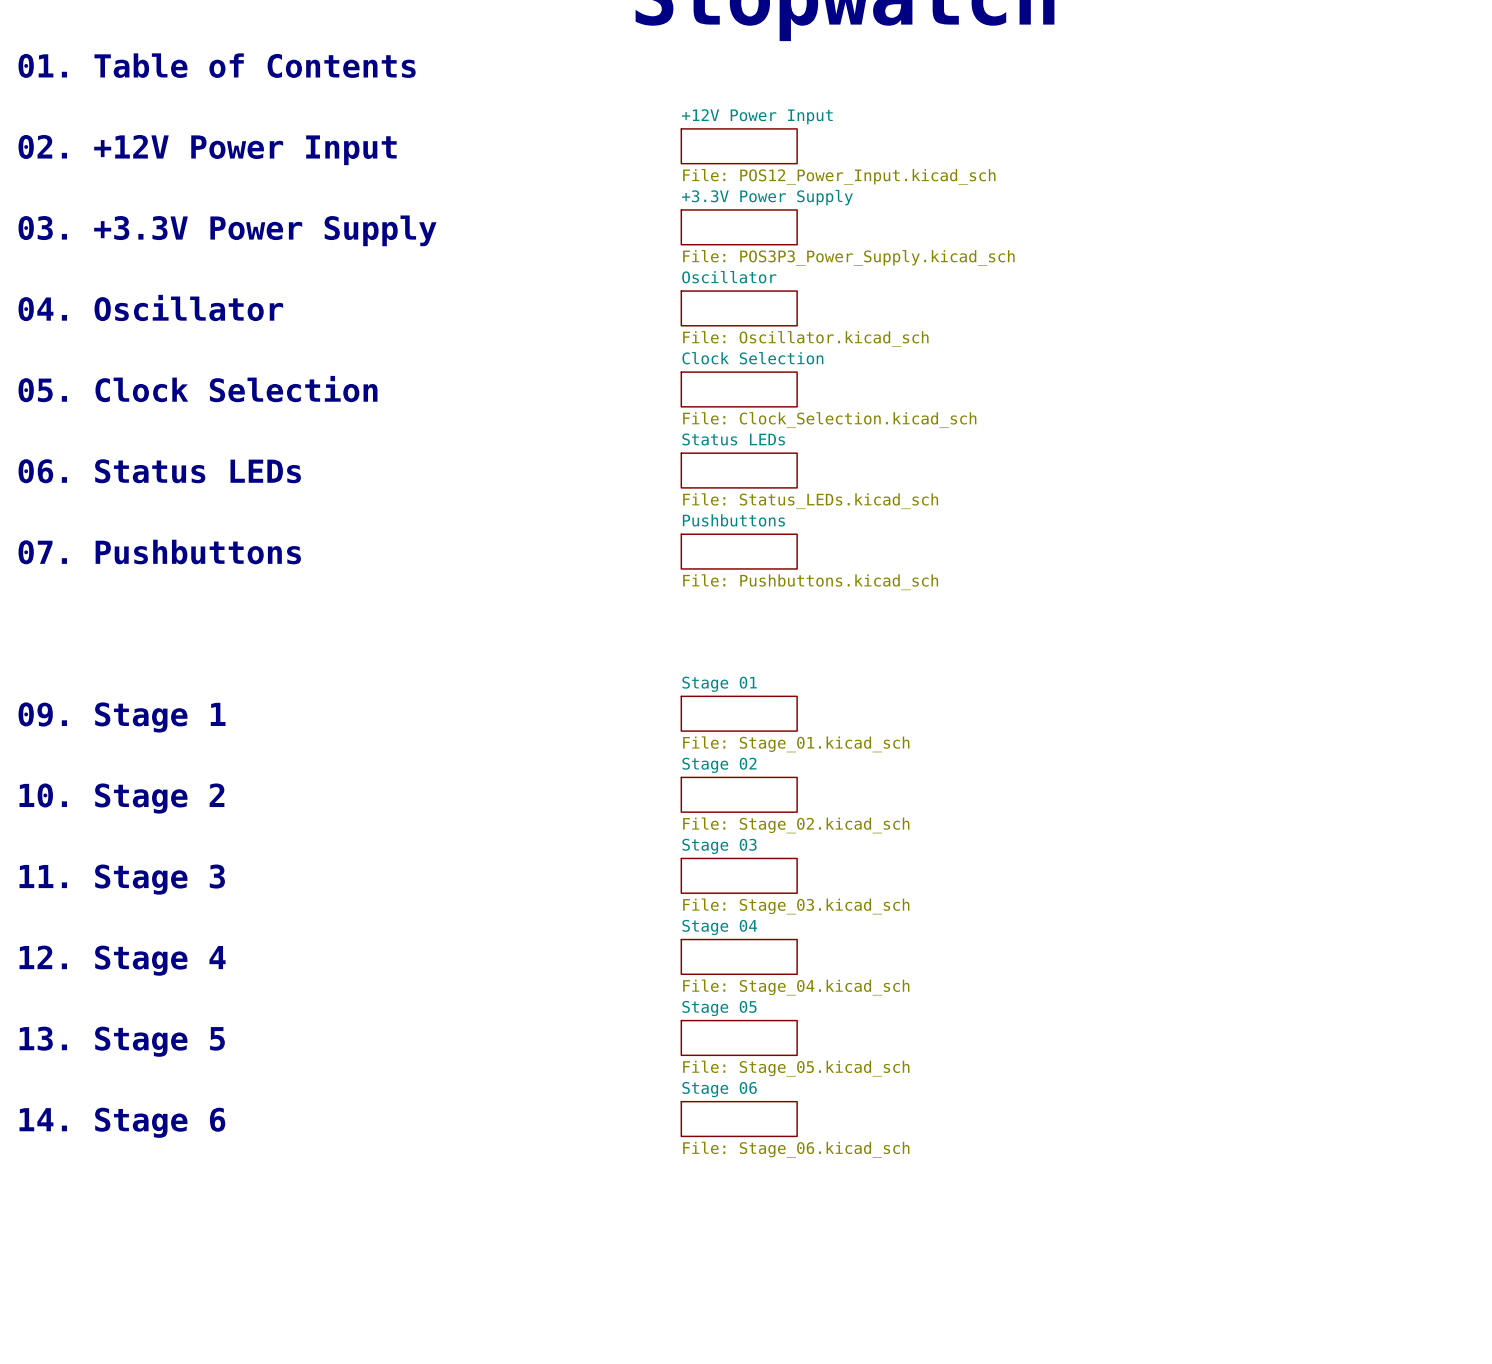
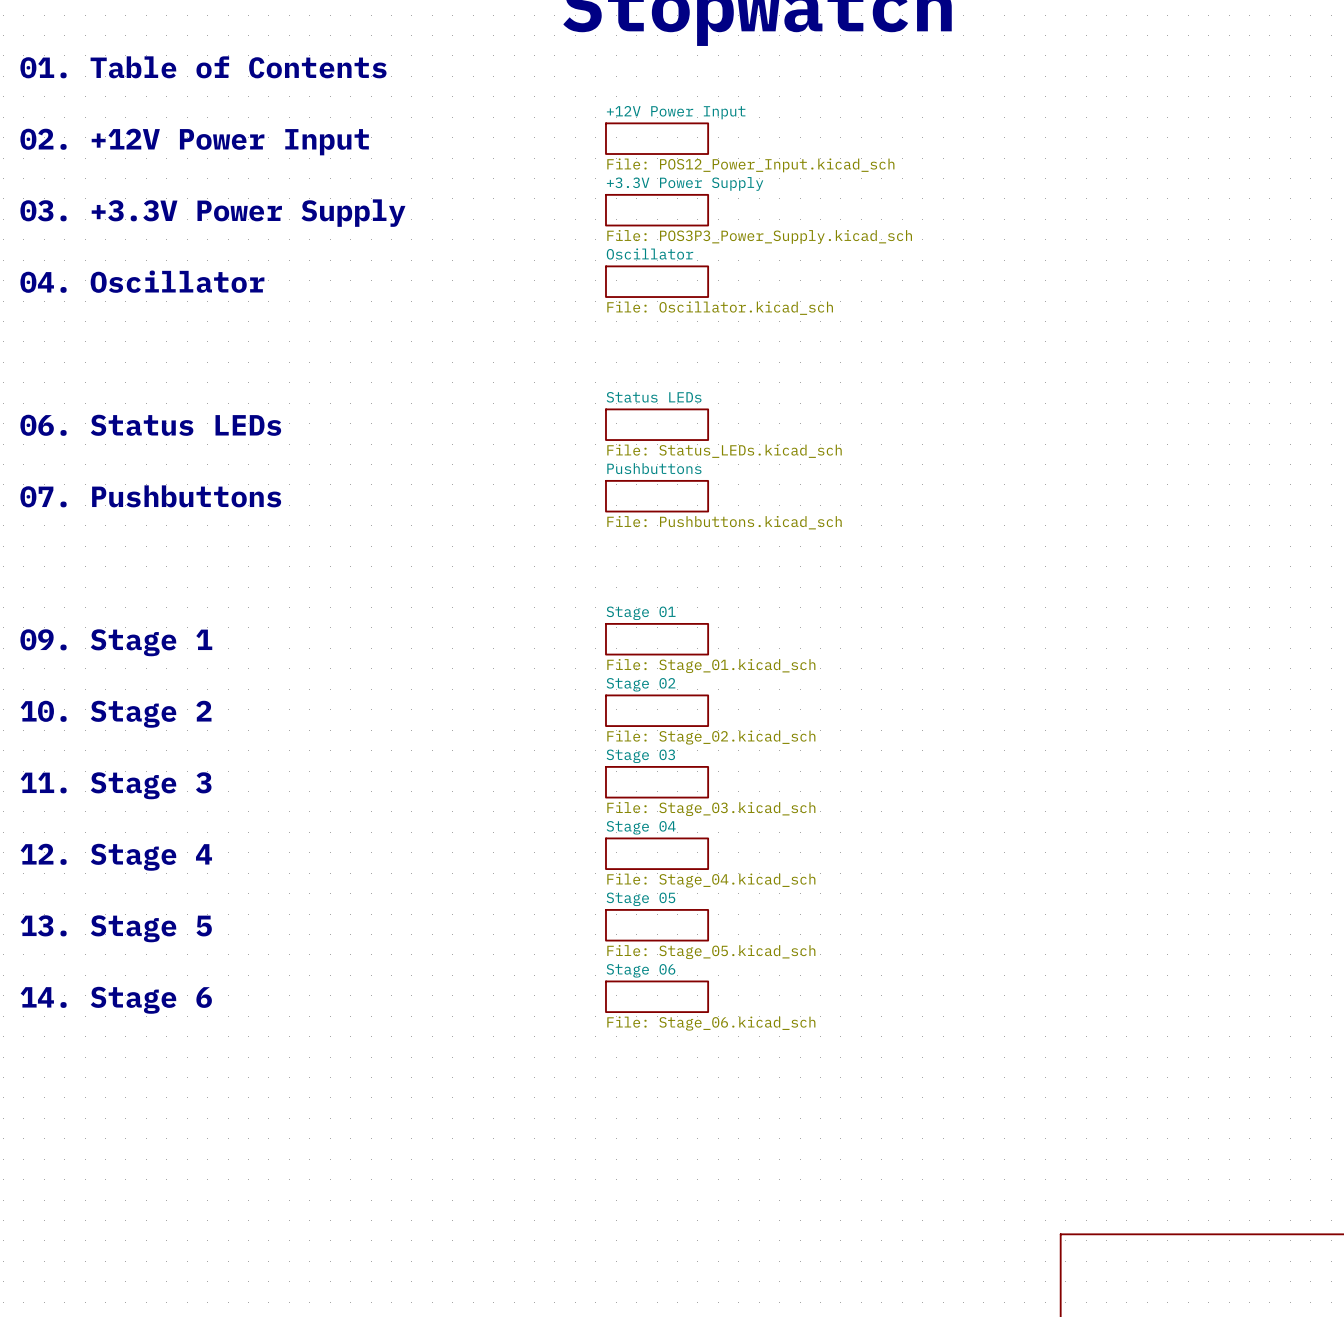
text: 05. Clock Selection (198, 389) -> none
sheet Clock Selection: File: Clock_Selection.kicad_sch (739, 389) -> none

